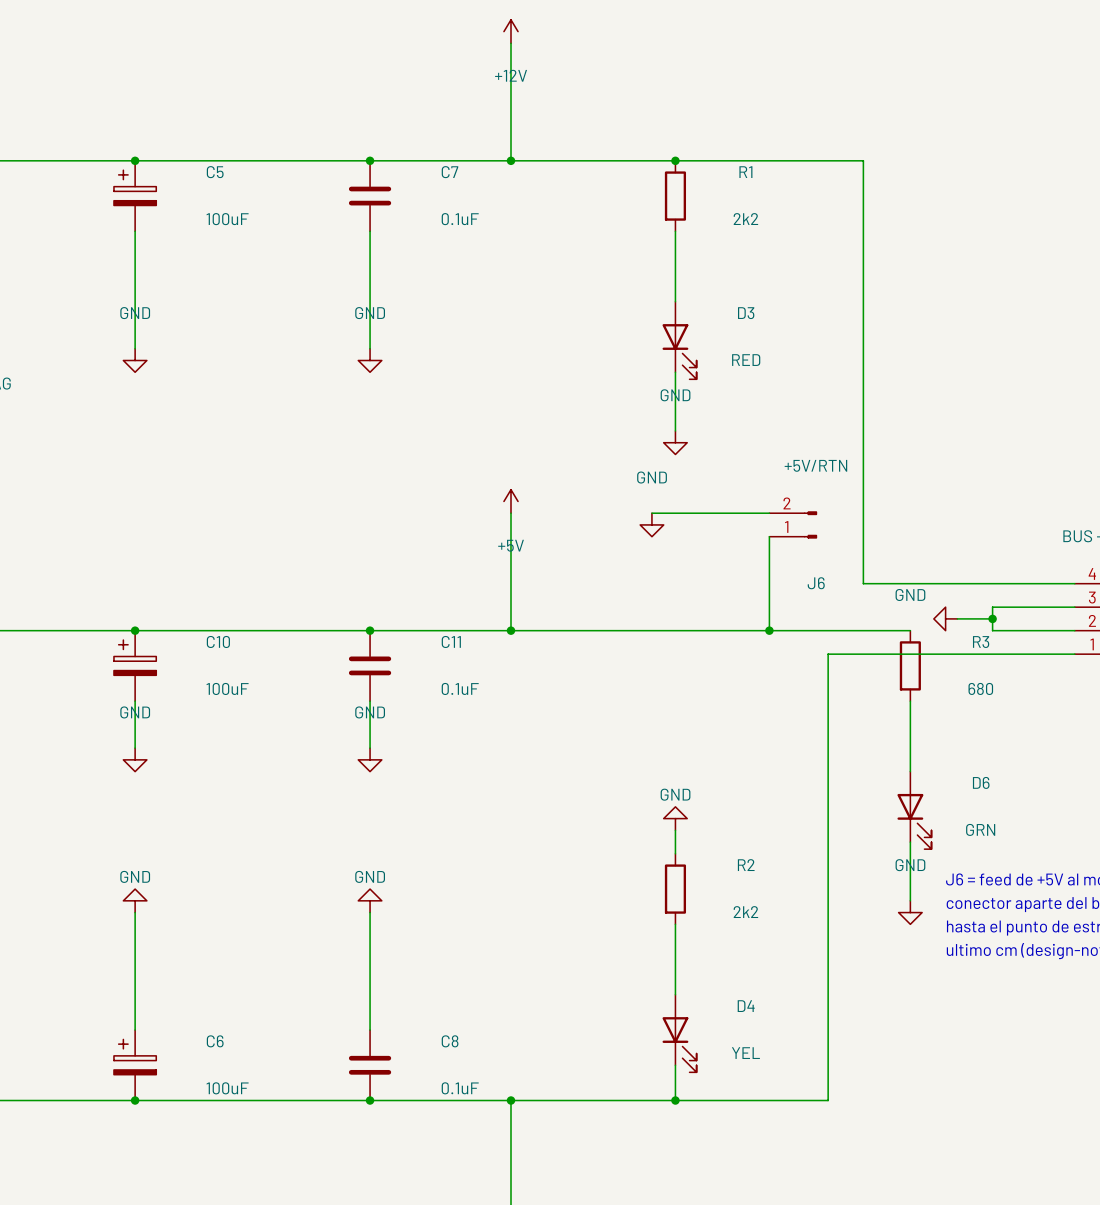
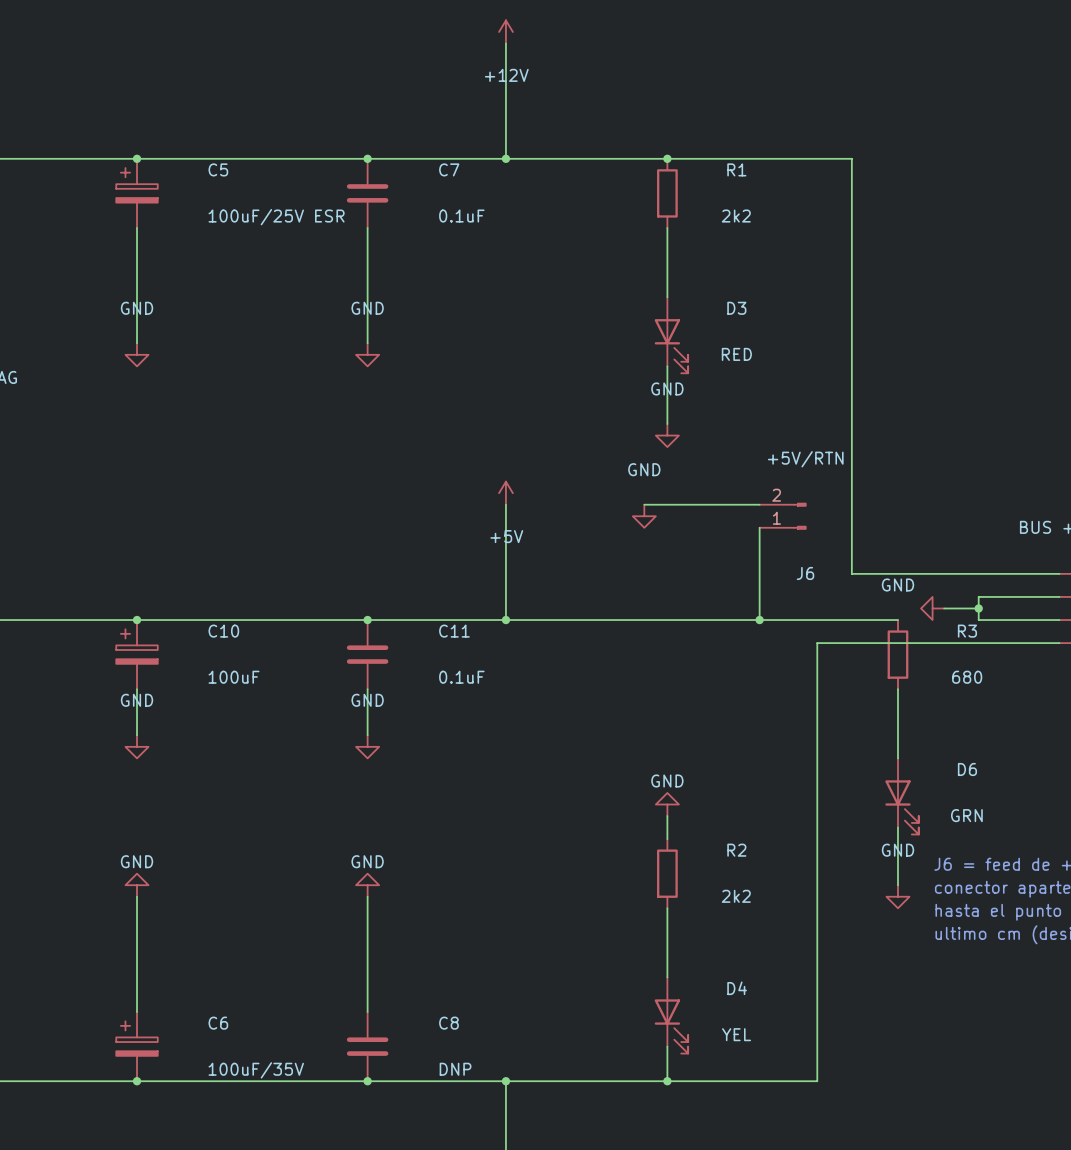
C5 value: 100uF (227, 219) -> 100uF/25V ESR (276, 217)
C6 value: 100uF (227, 1088) -> 100uF/35V (256, 1070)
C8 value: 0.1uF (460, 1088) -> DNP (455, 1069)

